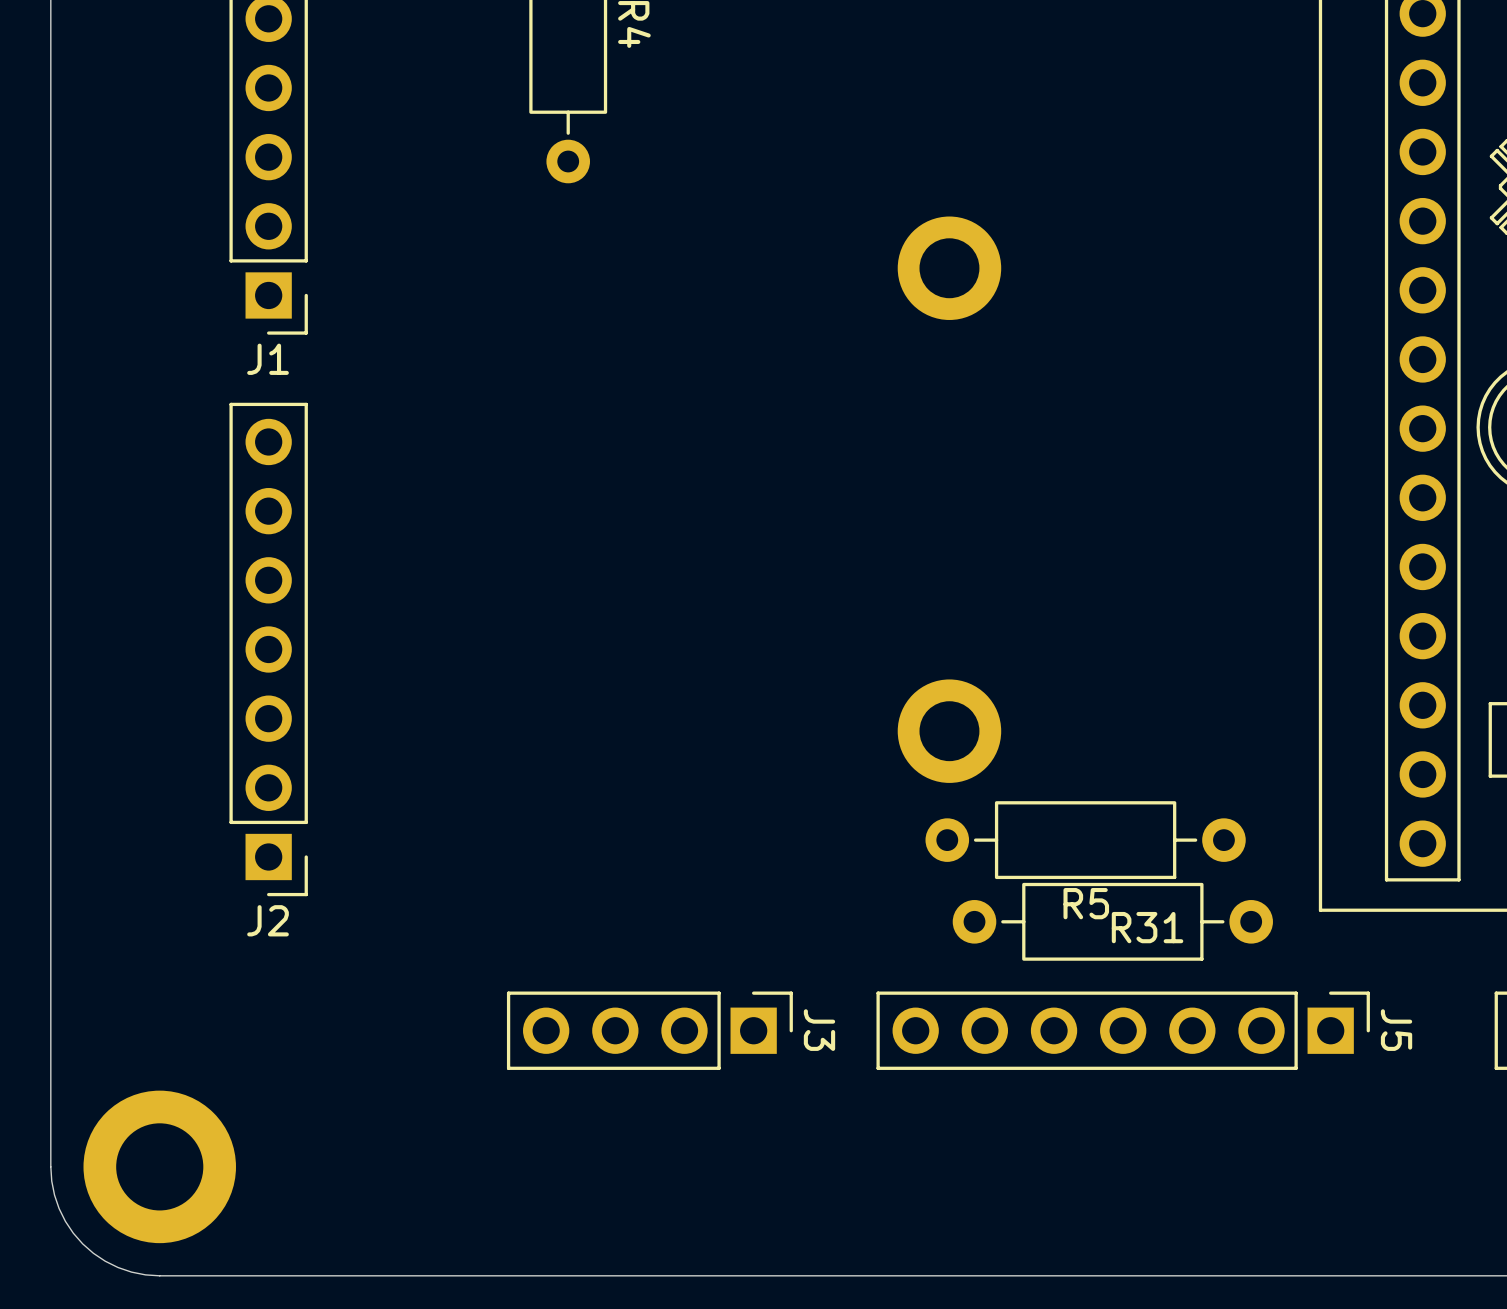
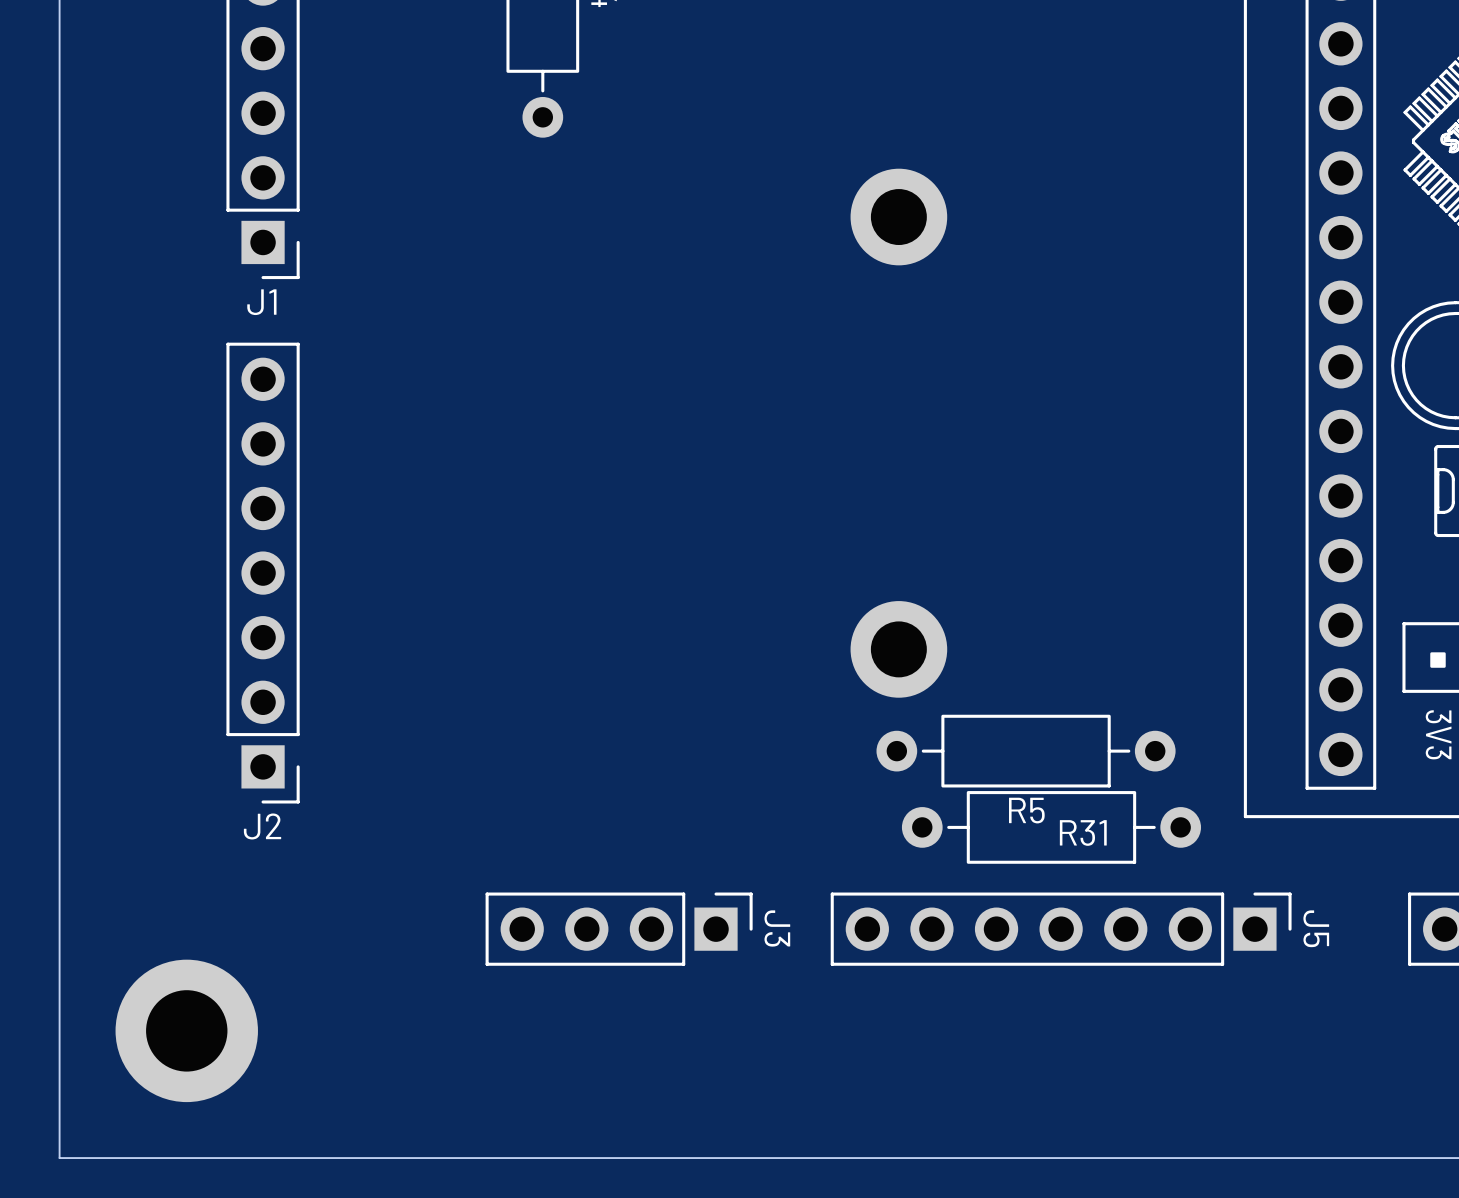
board edge: (50, 1166) (51, 1181) (59, 1208) (73, 1233) (82, 1243) (93, 1253) (118, 1267) (131, 1272) (159, 1275) -> (59, 1056) (59, 1158) (161, 1158)
part position: (159, 1166) -> (186, 1030)

